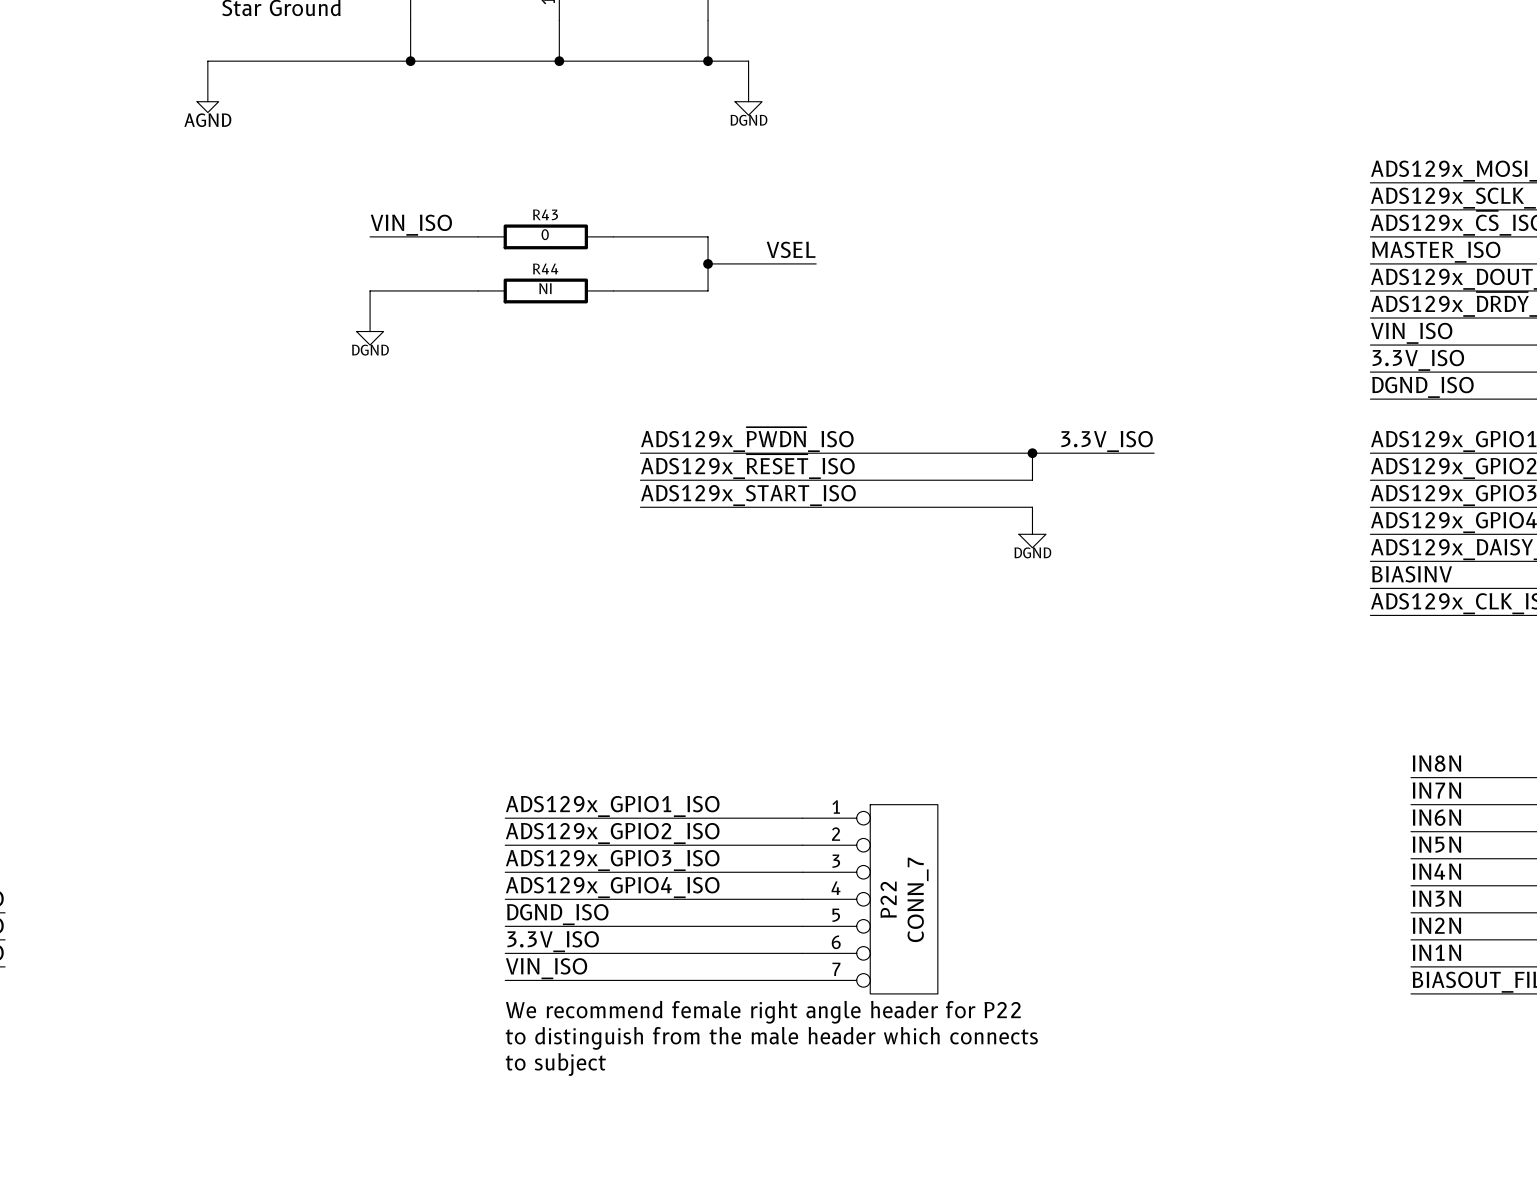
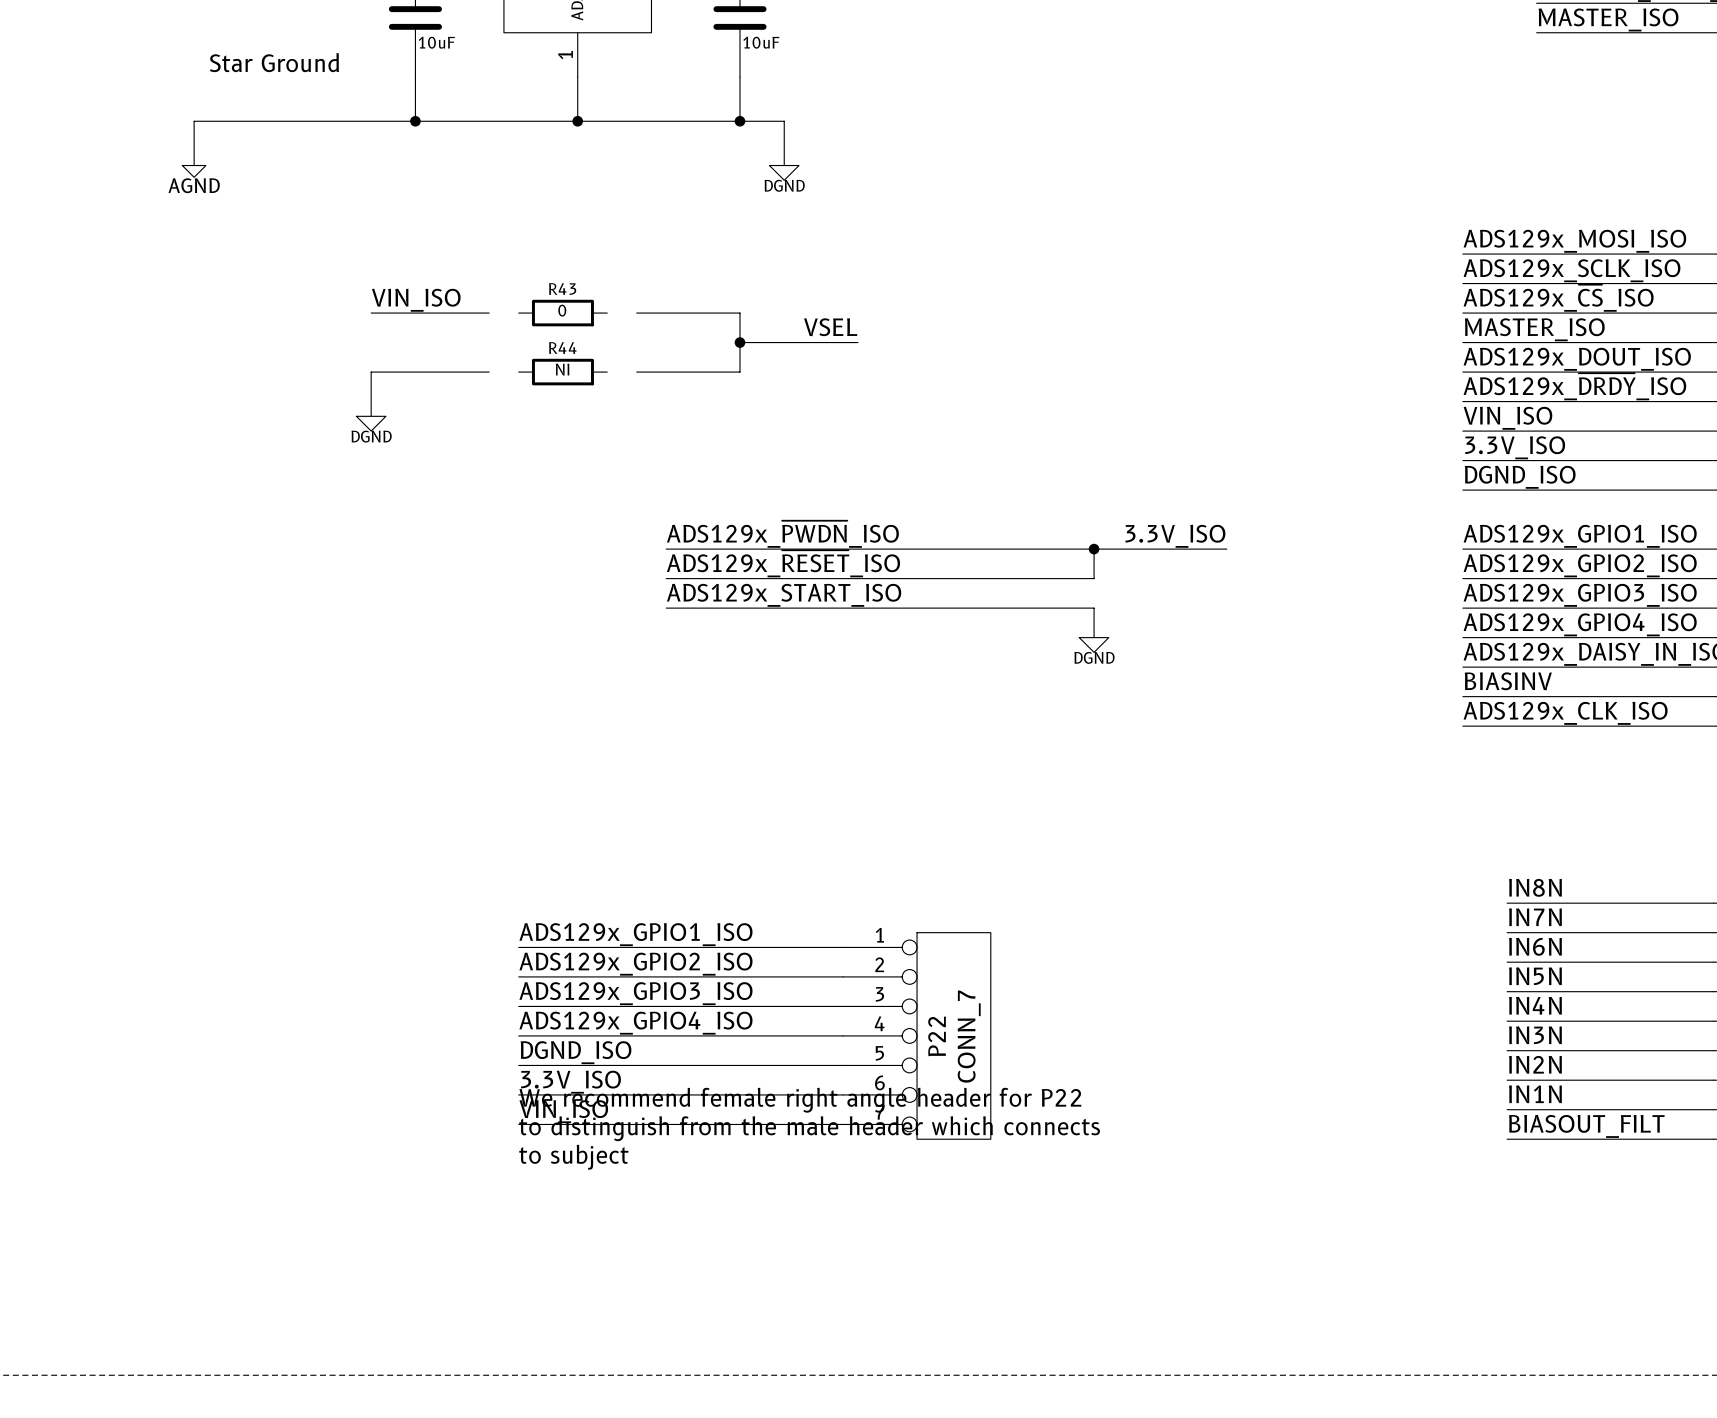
R43 symbol: [478, 224, 614, 250] -> [518, 299, 608, 327]
R44 symbol: [478, 278, 614, 304] -> [518, 358, 608, 386]
text: none -> We recommend female right angle header for P22 (800, 1100)
text: We recommend female right angle header for P22 (763, 1012) -> to subject (573, 1157)
text position: to distinguish from the male header which connects (771, 1038) -> to distinguish from the male header which connects (809, 1128)
text: to subject (555, 1064) -> none

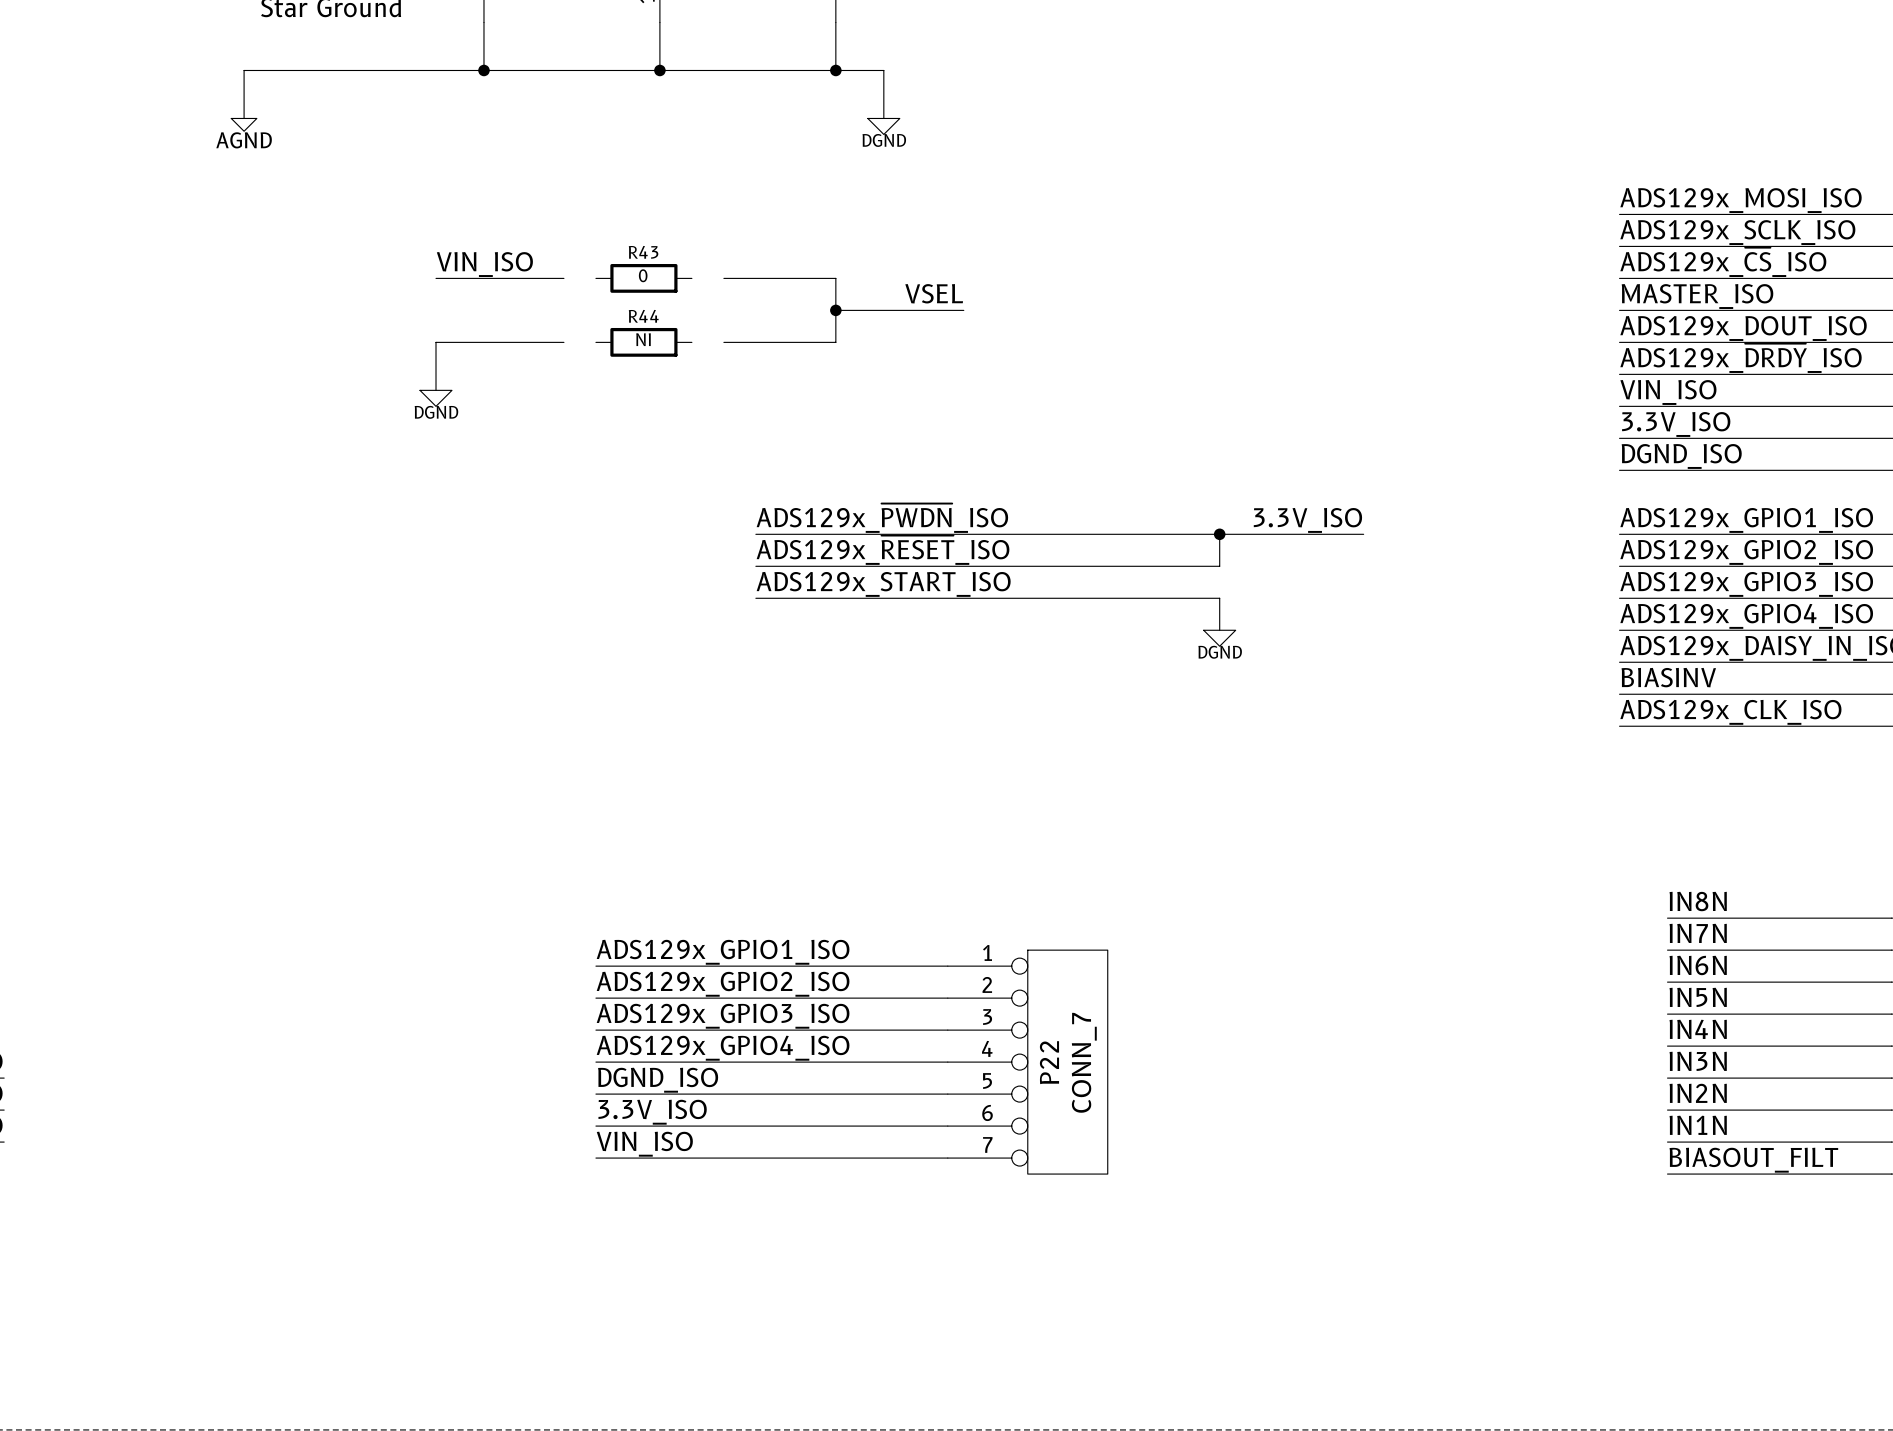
text: We recommend female right angle header for P22 (800, 1100) -> none
text: to distinguish from the male header which connects (809, 1128) -> none
text: to subject (573, 1157) -> none

